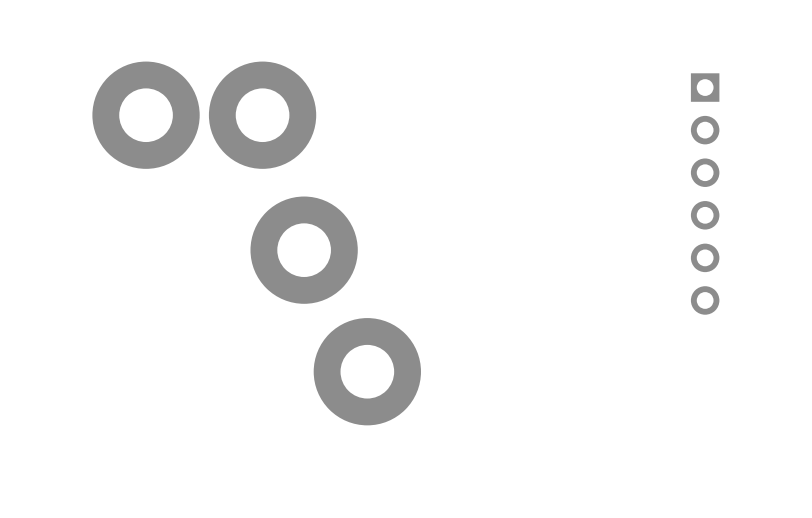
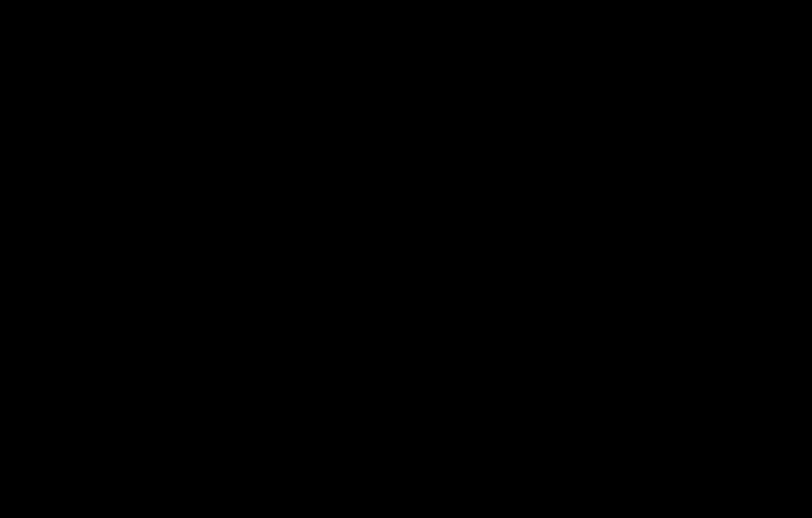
part: (146, 115) -> none
part: (262, 115) -> none
part: (705, 194) -> none
part: (304, 250) -> none
part: (367, 371) -> none

